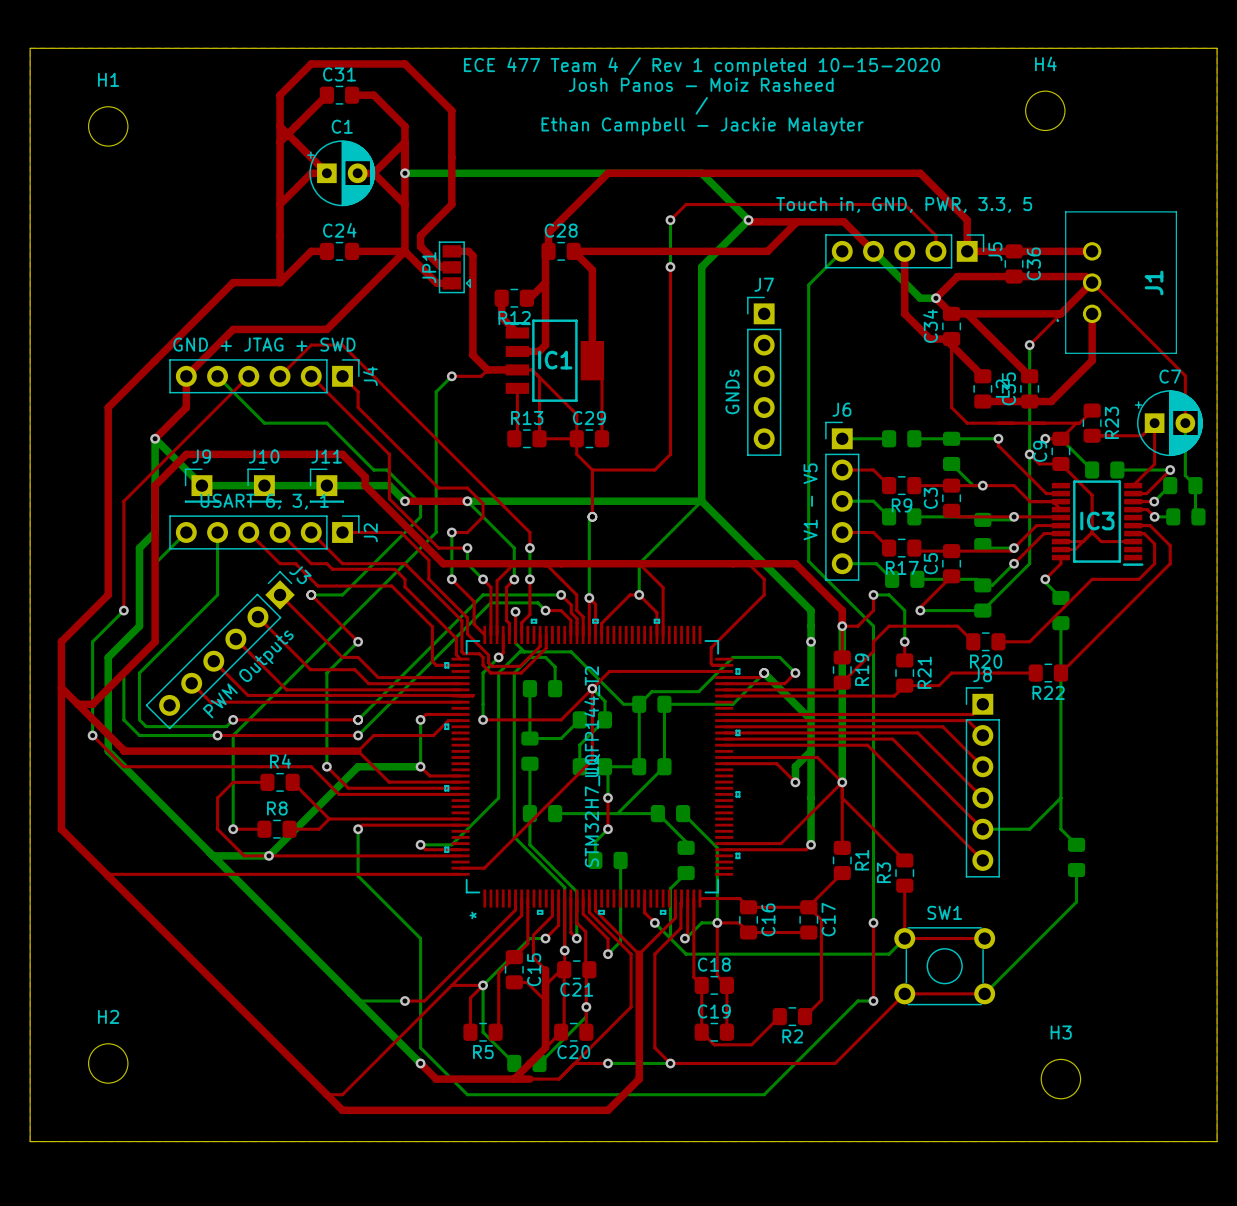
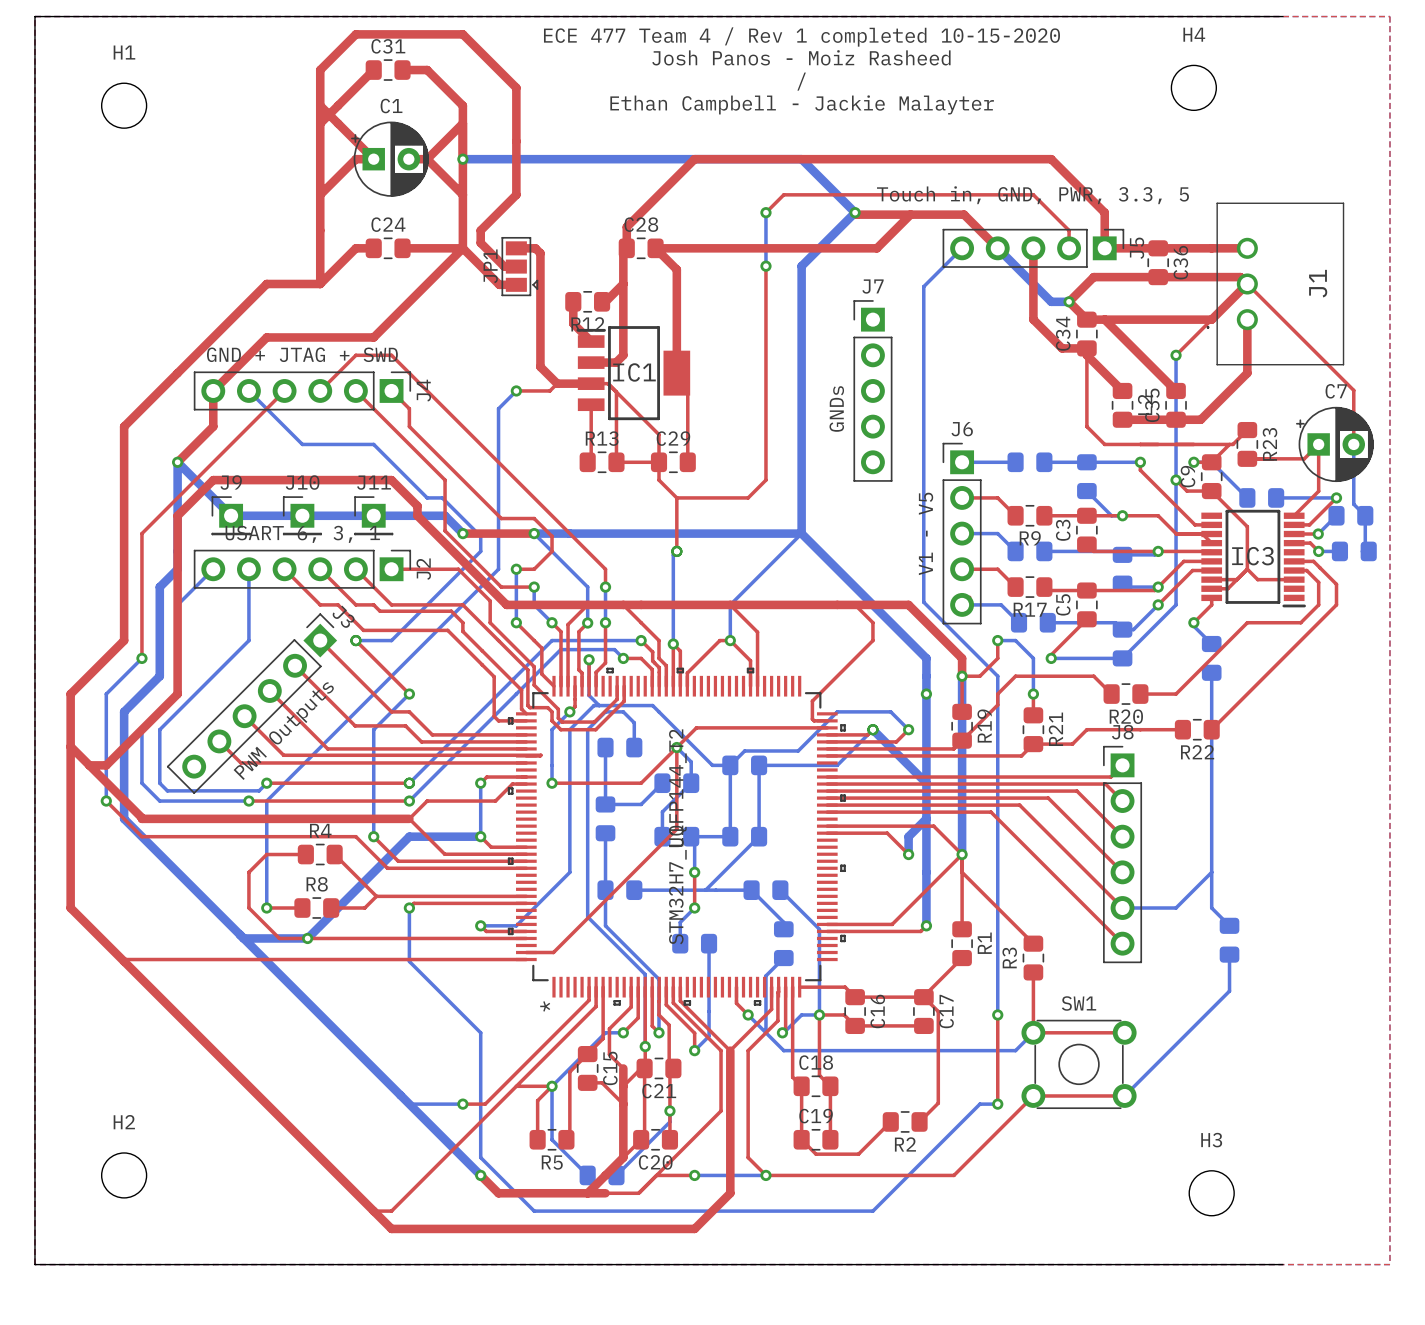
board edge: (1123, 48) (1217, 48) (1217, 1141) (1123, 1141) -> none

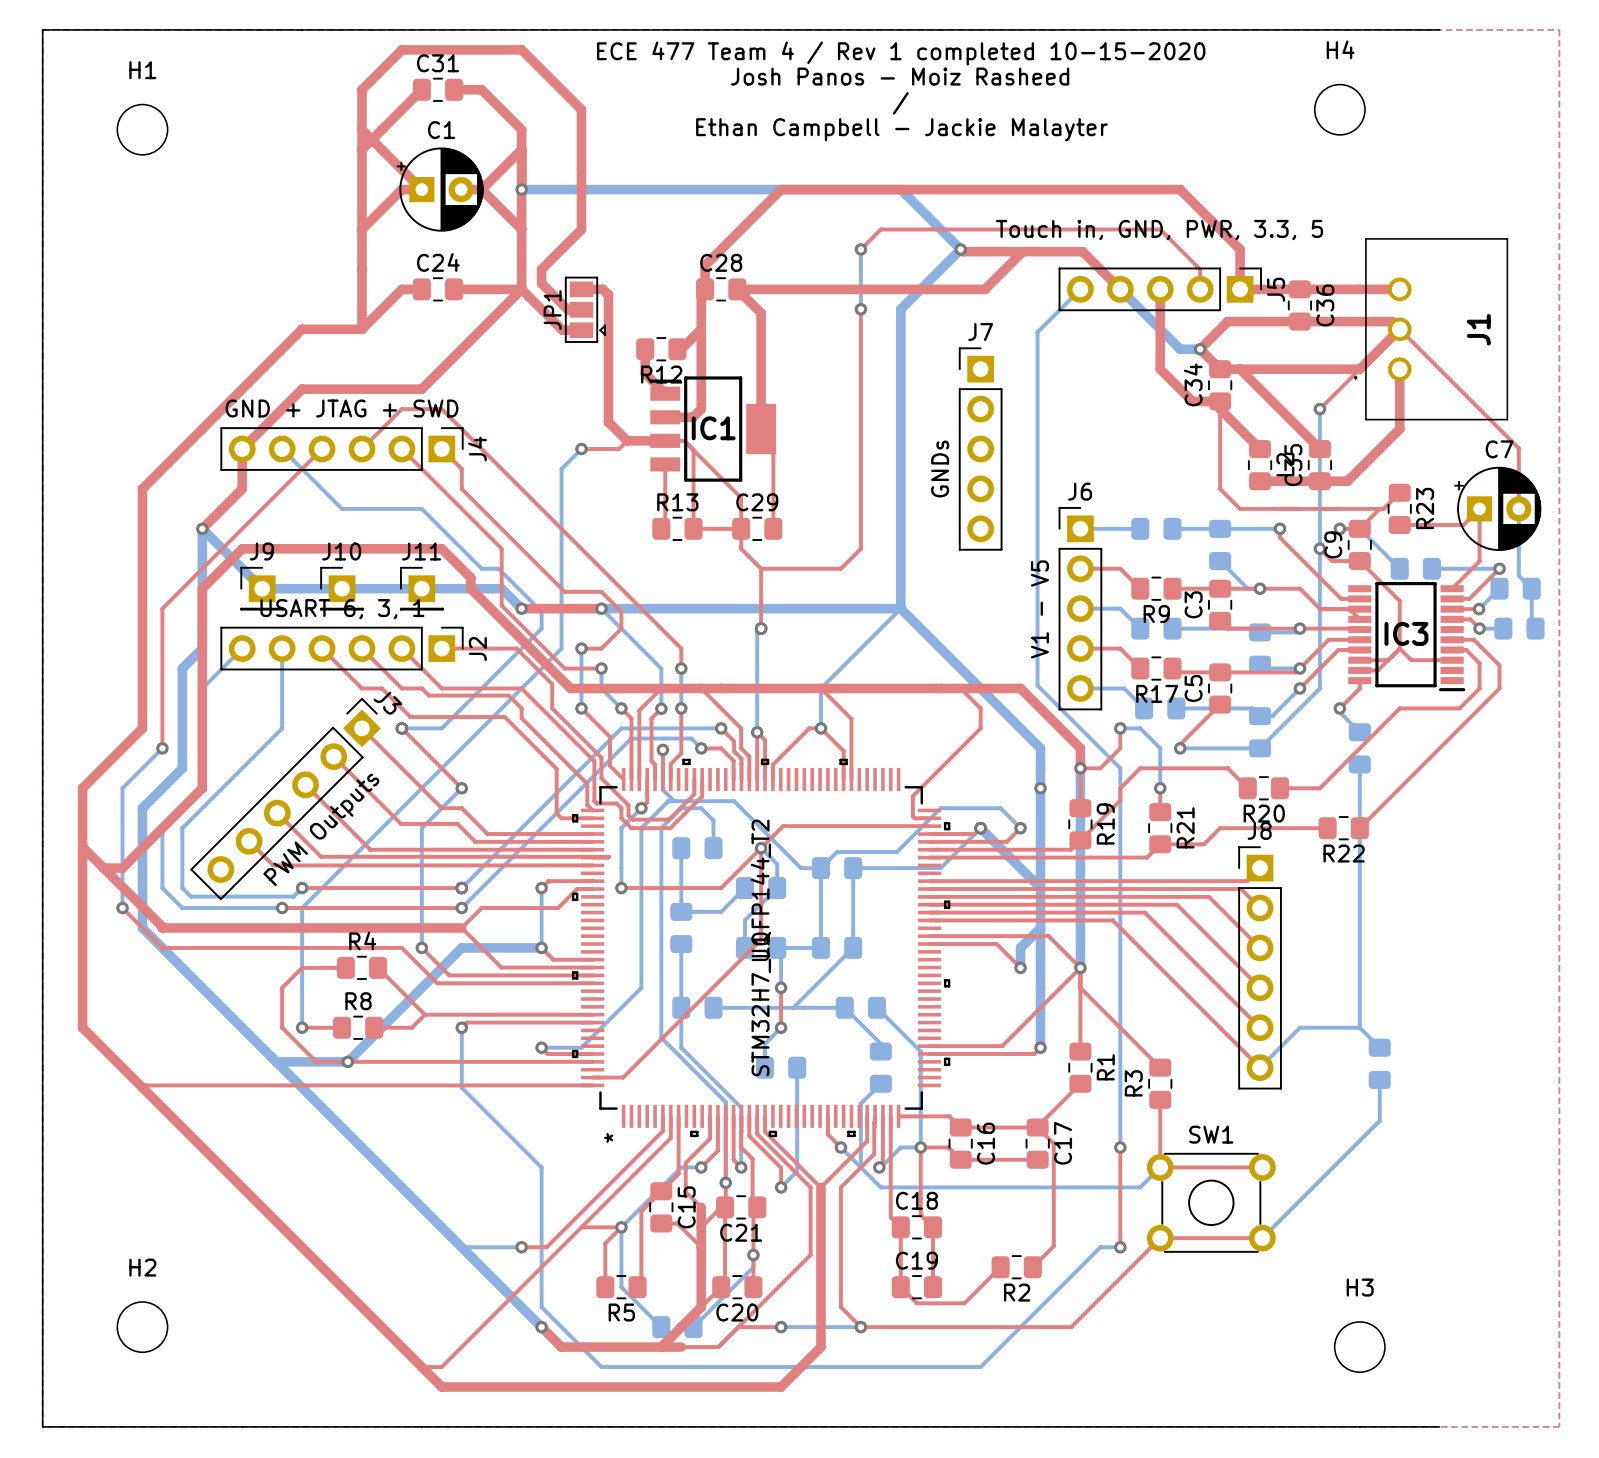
bottom track: (1211, 872) (1176, 908) -> (1359, 1027) (1319, 1027)
bottom track: (1122, 908) (1158, 908) -> (1260, 1067) (1299, 1027)

